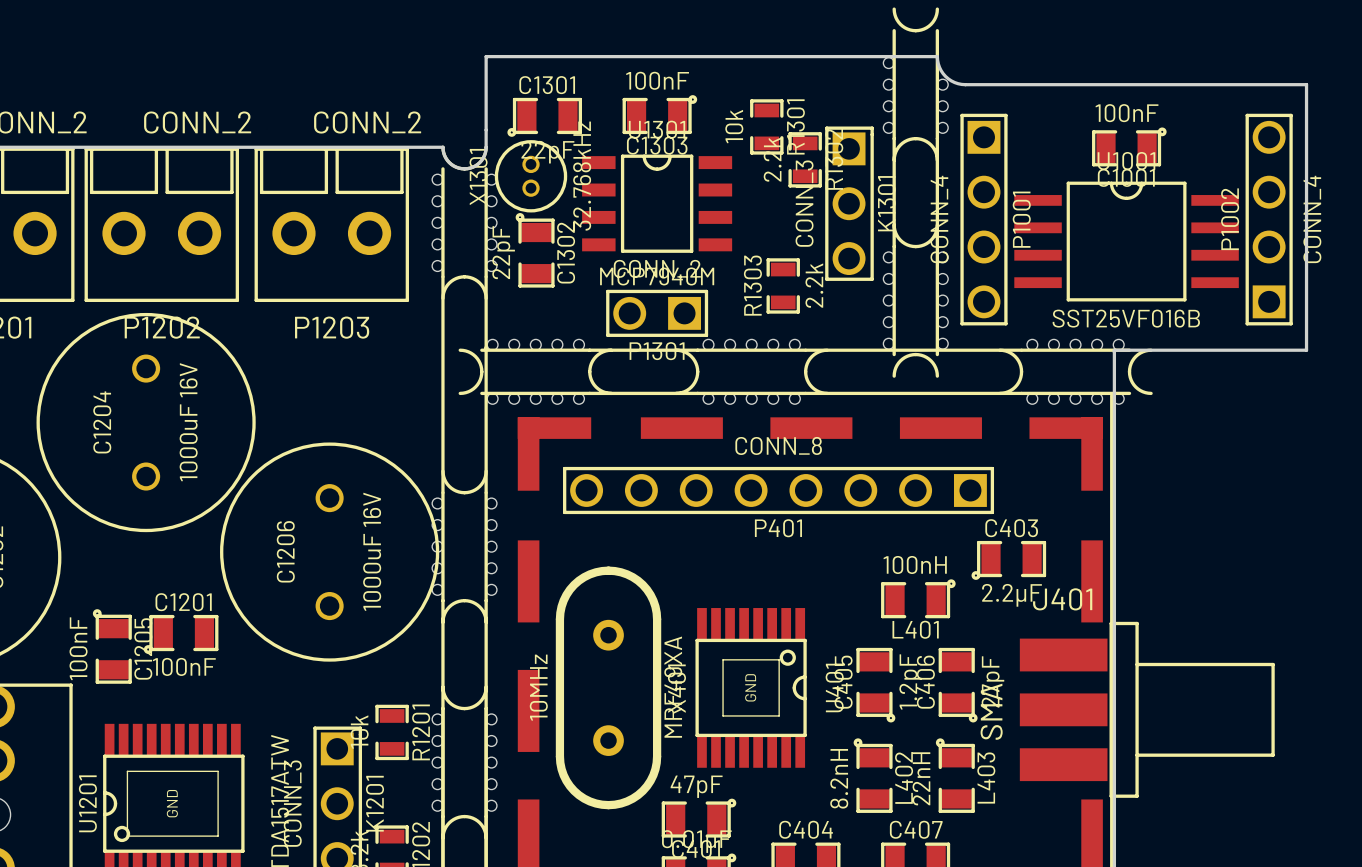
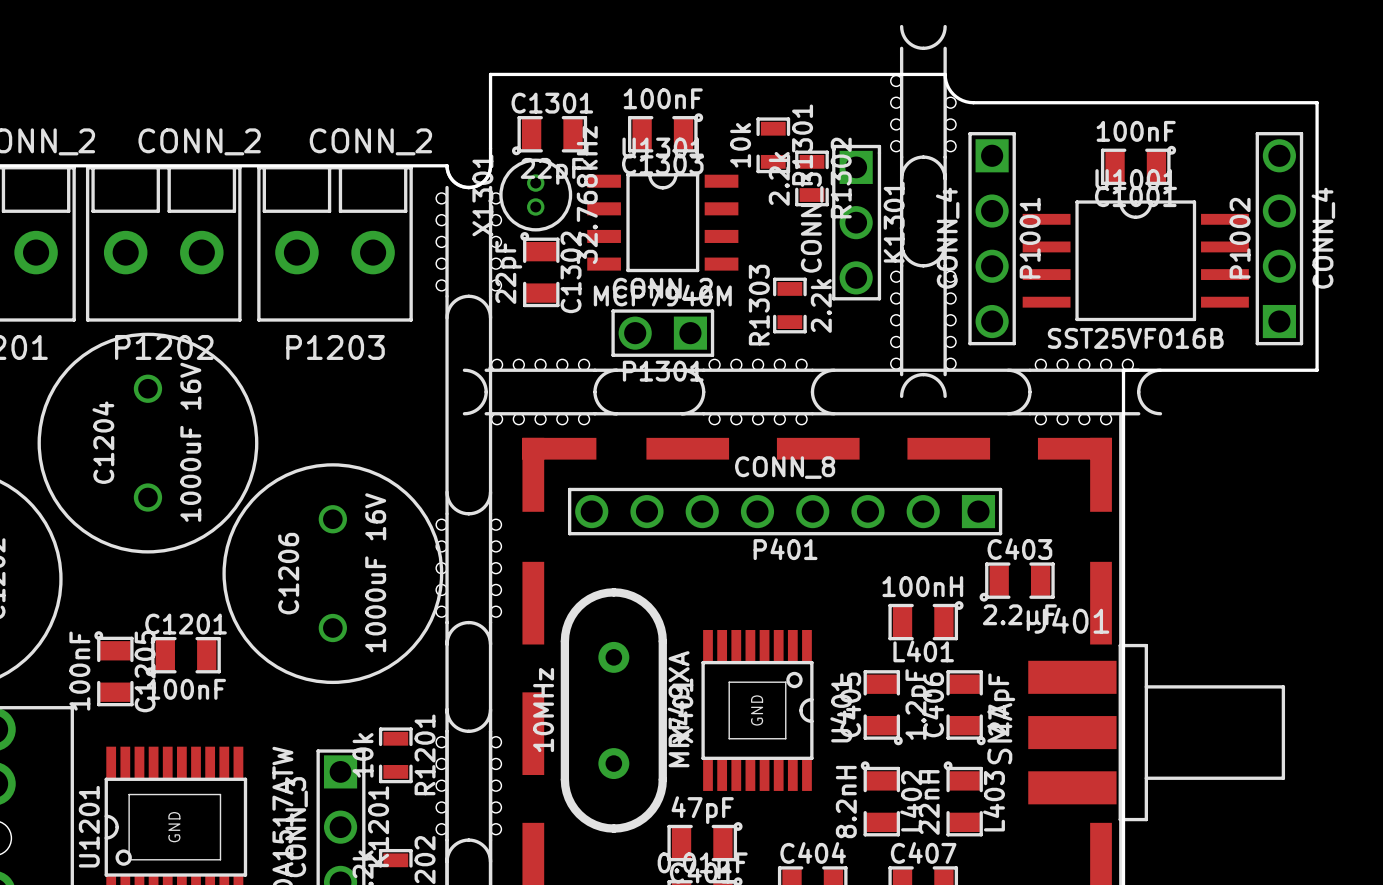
part footprint: [998, 339, 1153, 405] -> [1006, 359, 1163, 425]

